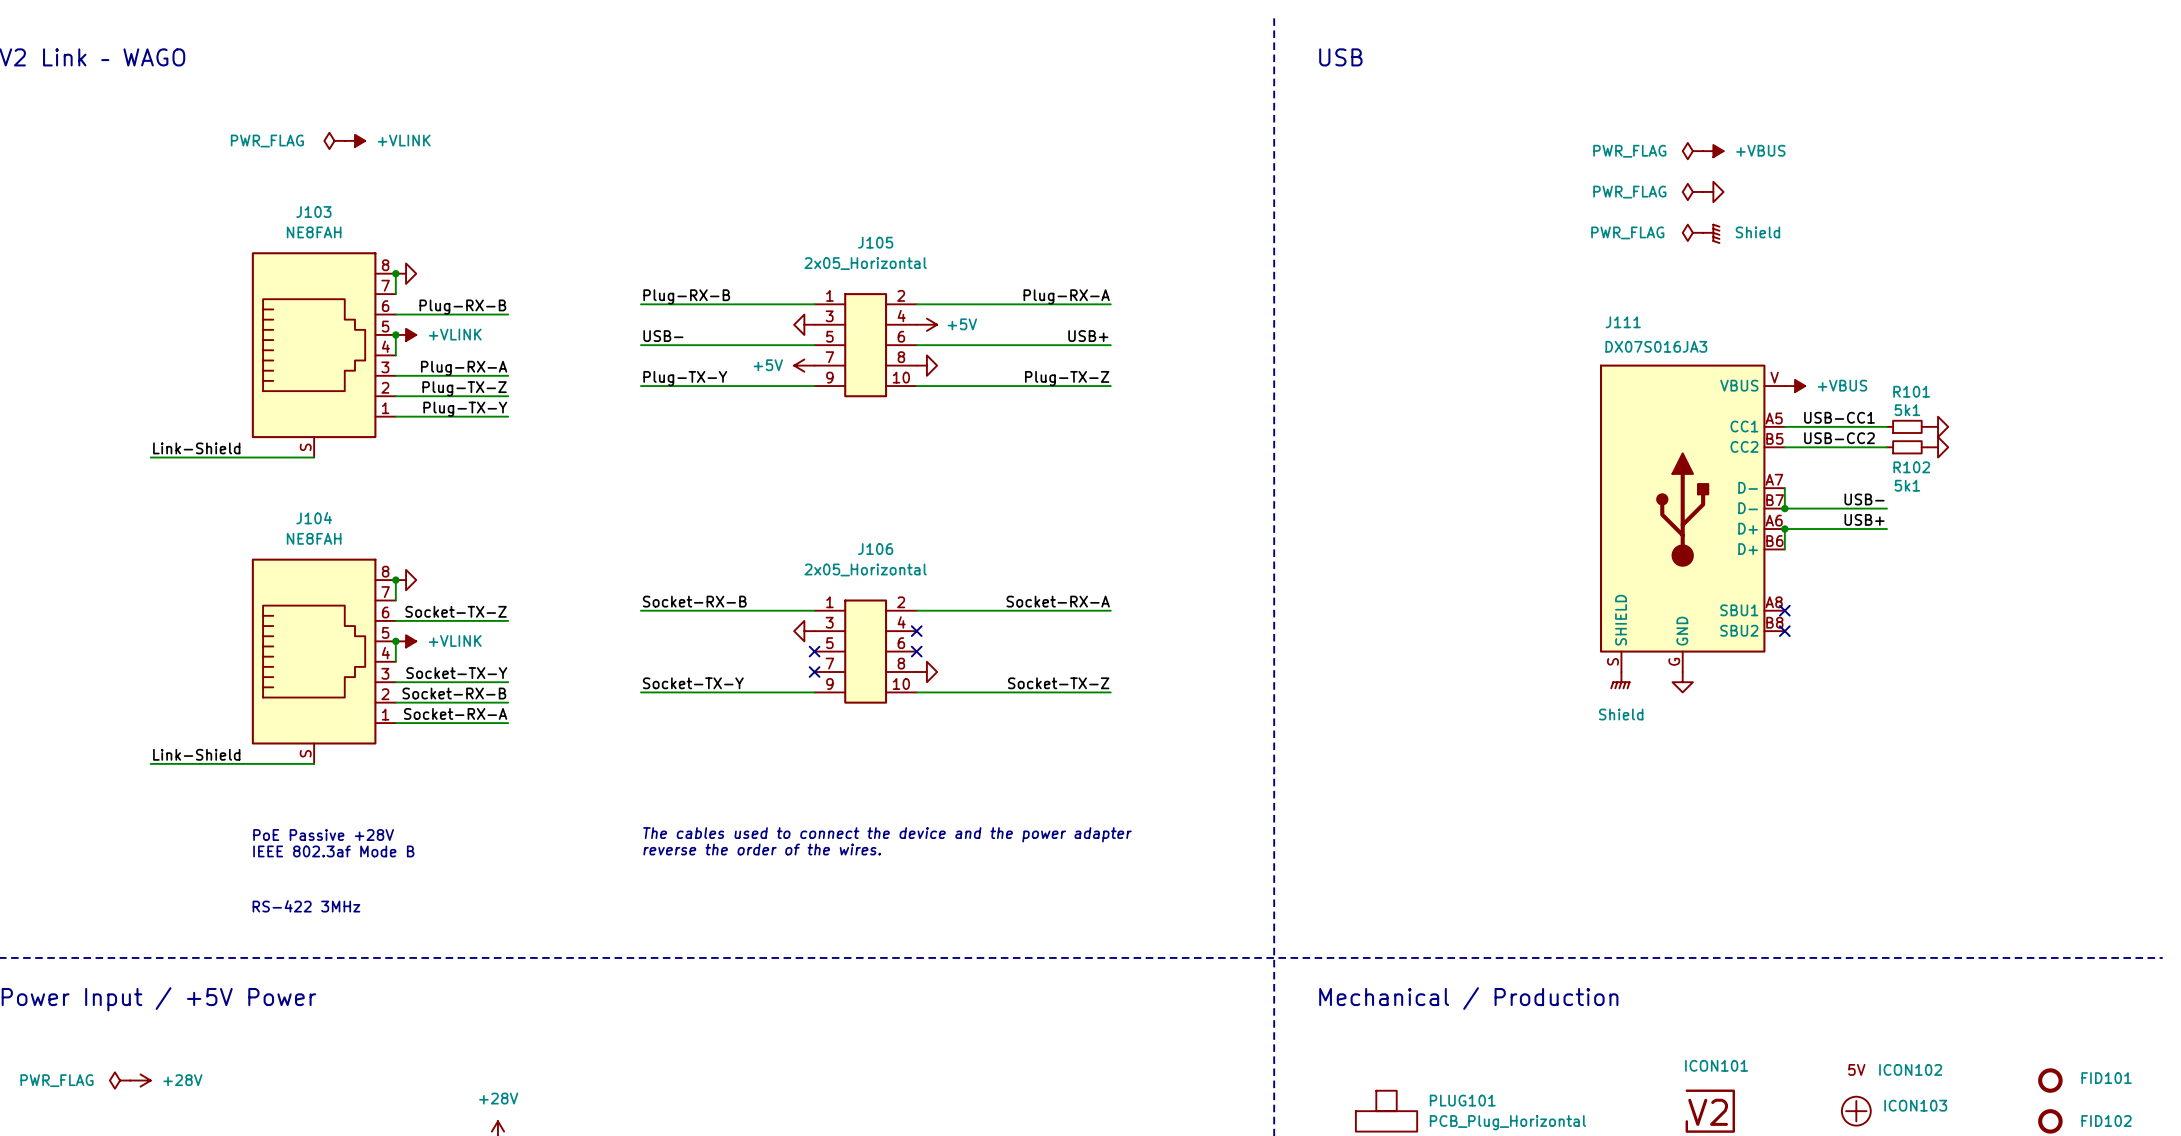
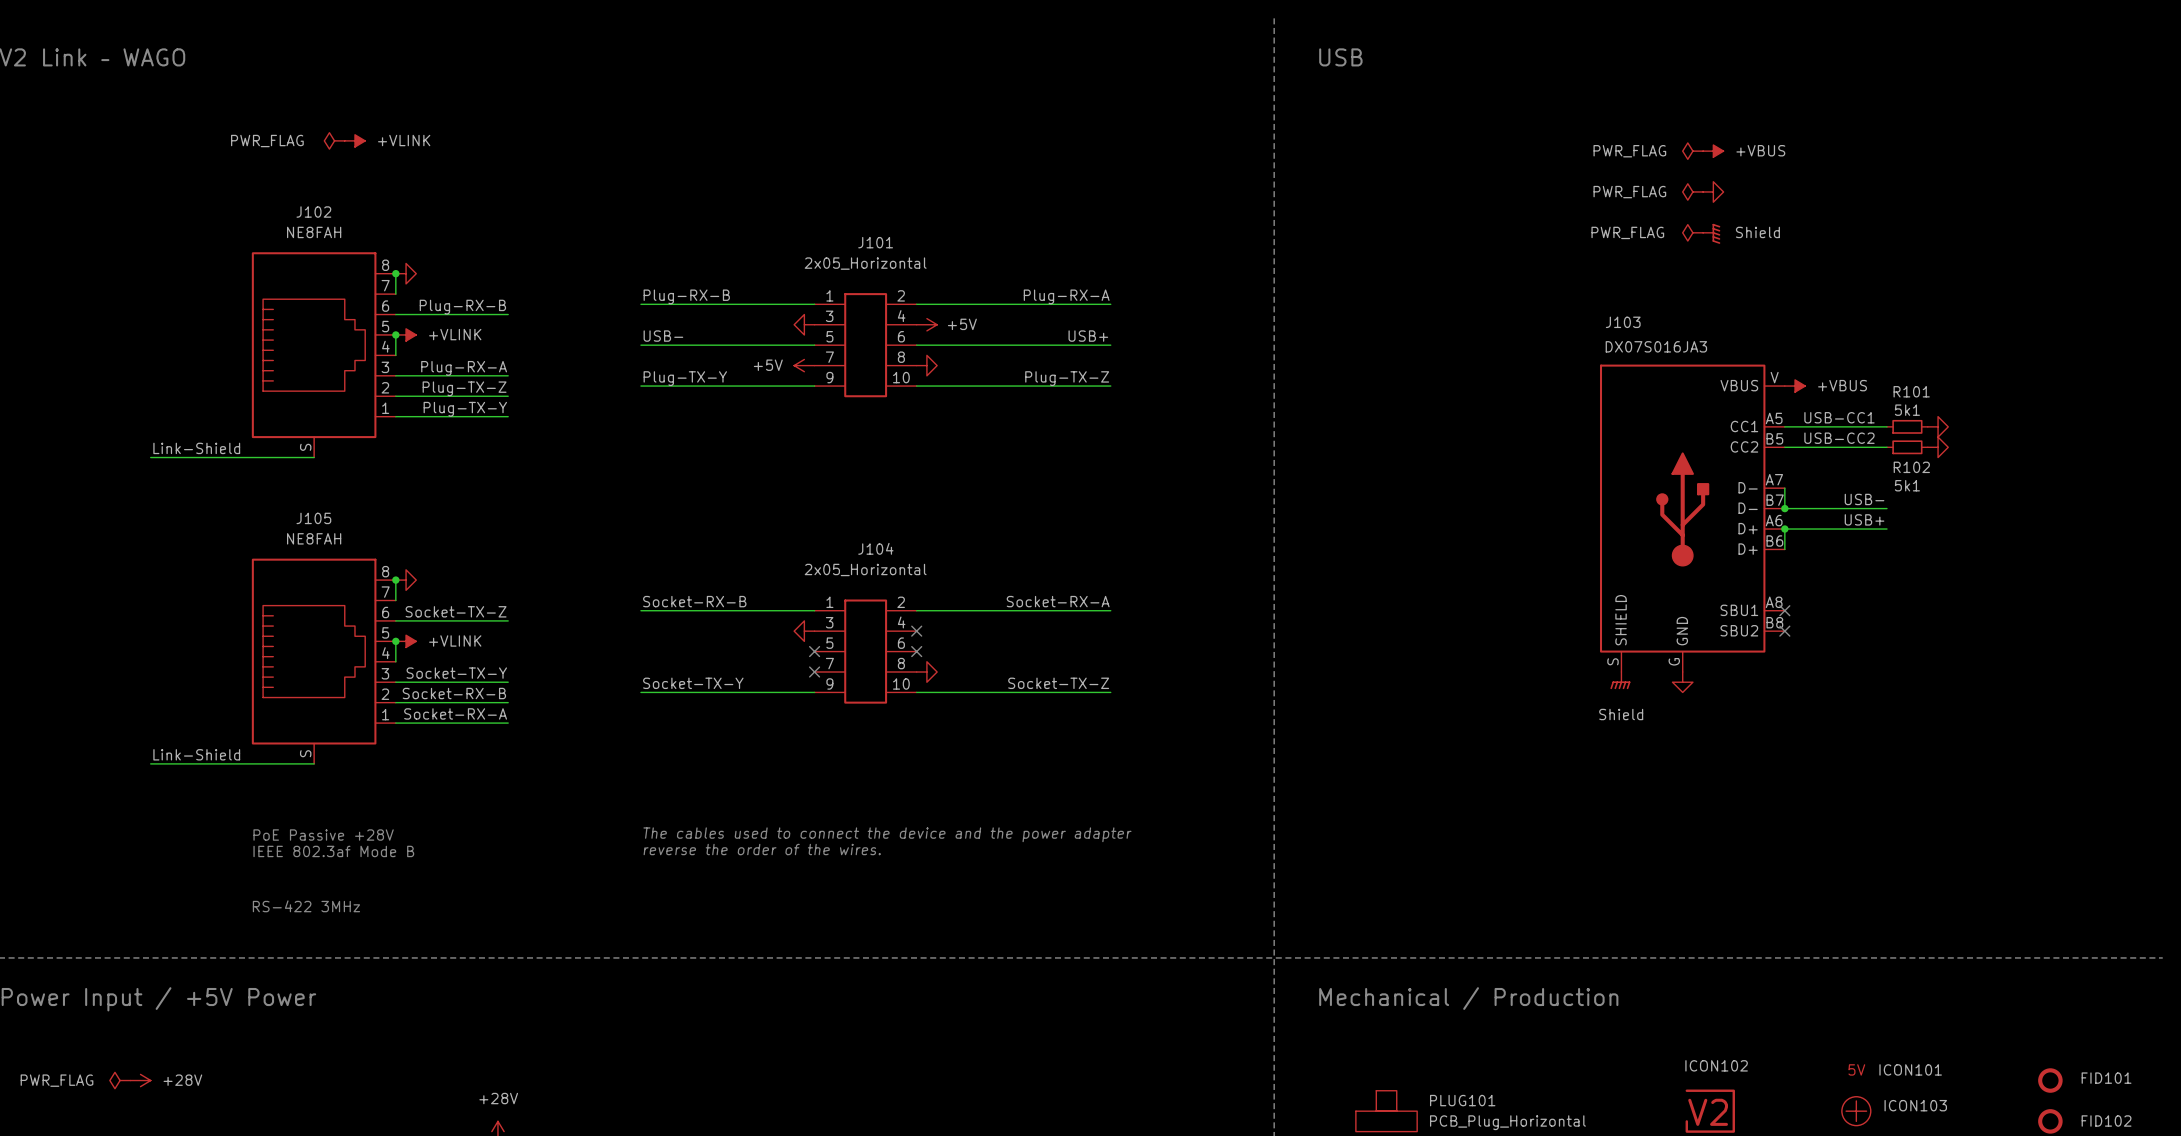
J103 name: J103 (313, 212) -> J102 (313, 212)
J105 name: J105 (875, 242) -> J101 (875, 242)
J111 name: J111 (1623, 322) -> J103 (1623, 322)
J104 name: J104 (314, 518) -> J105 (313, 518)
J106 name: J106 (875, 549) -> J104 (875, 548)
ICON101 name: ICON101 (1716, 1065) -> ICON102 (1716, 1065)
ICON102 name: ICON102 (1910, 1069) -> ICON101 (1910, 1069)

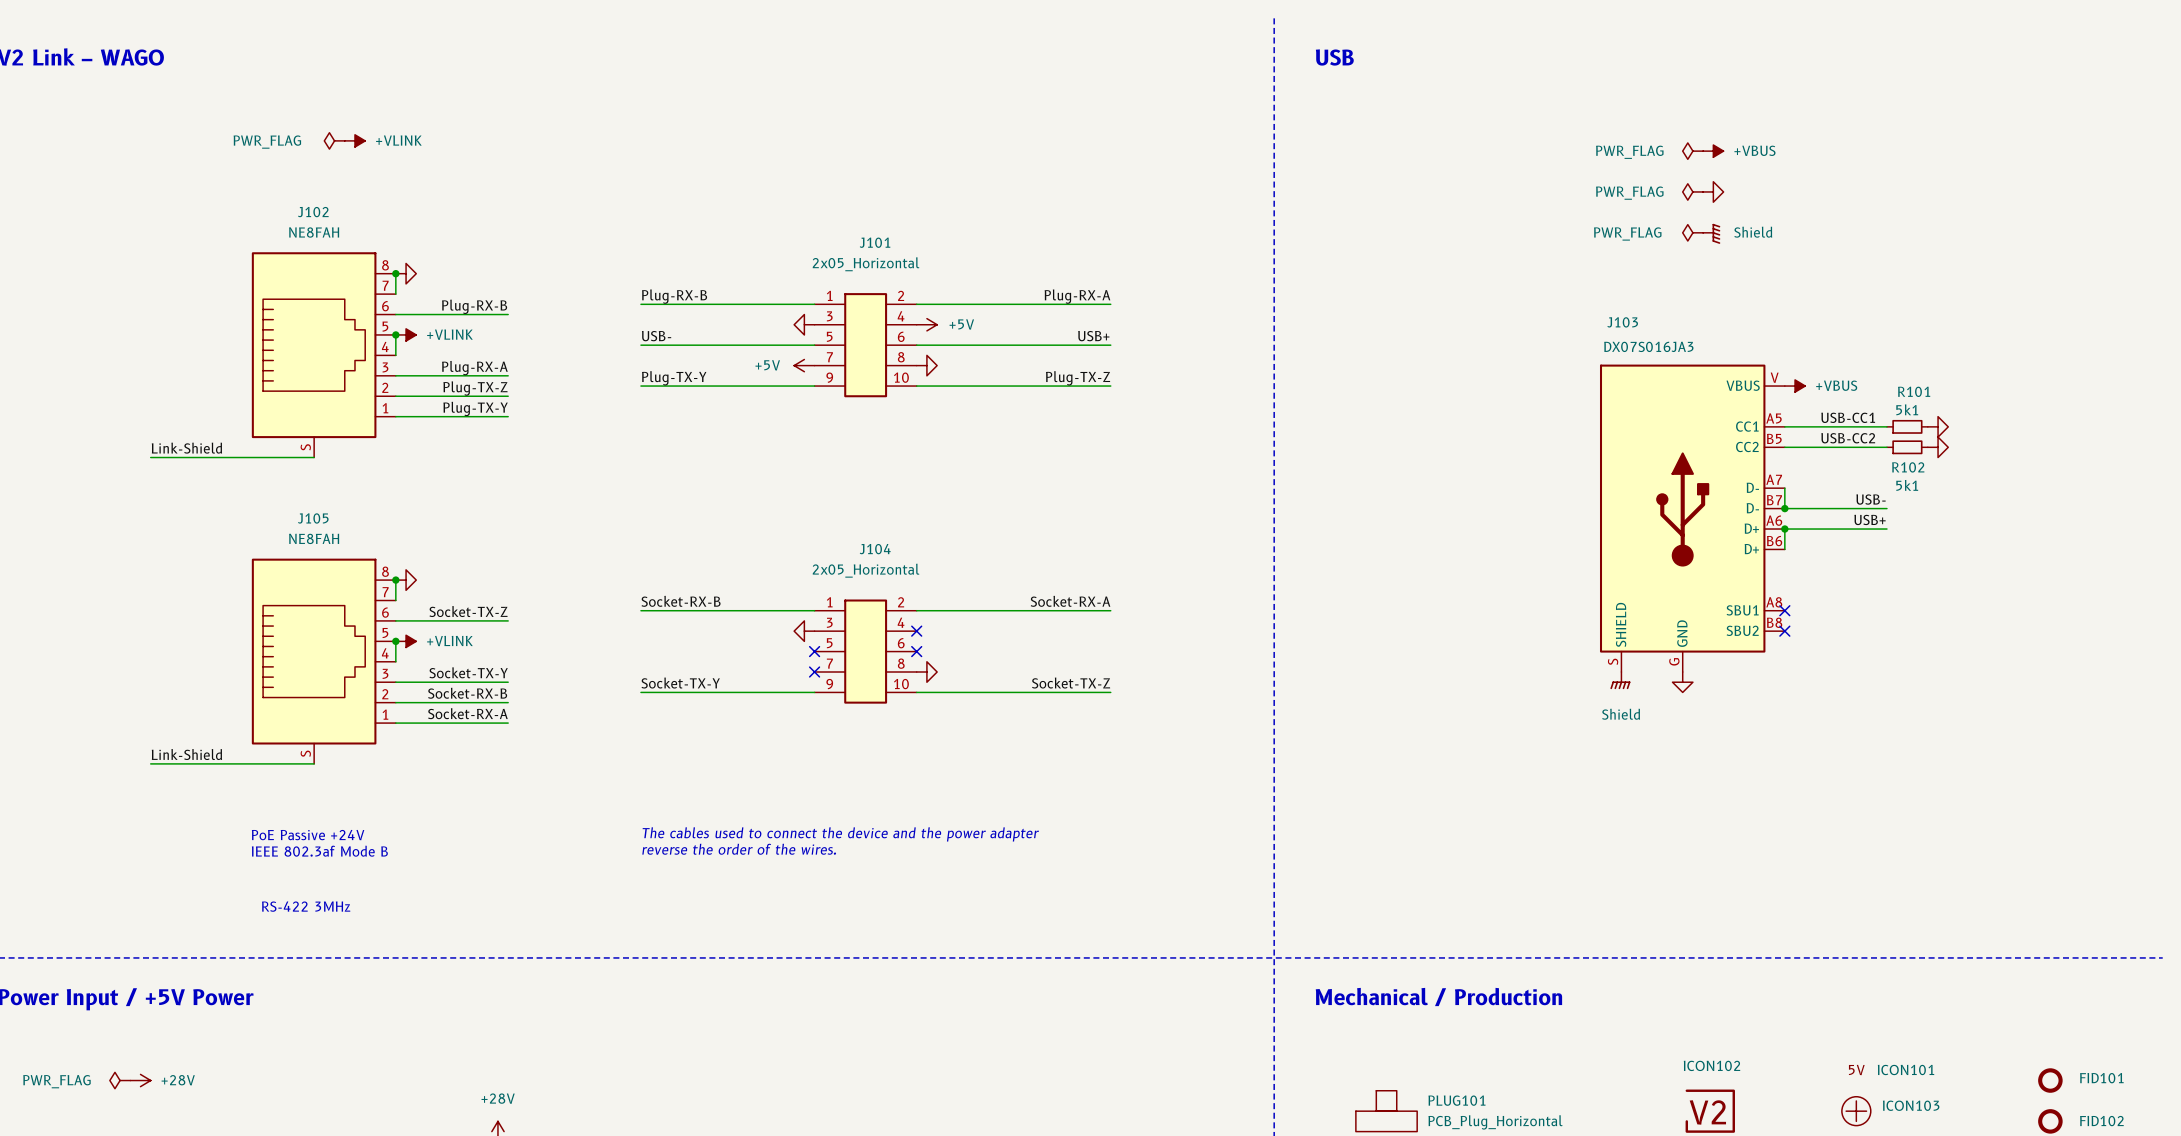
text: PoE Passive +28V (323, 835) -> PoE Passive +24V (308, 835)

